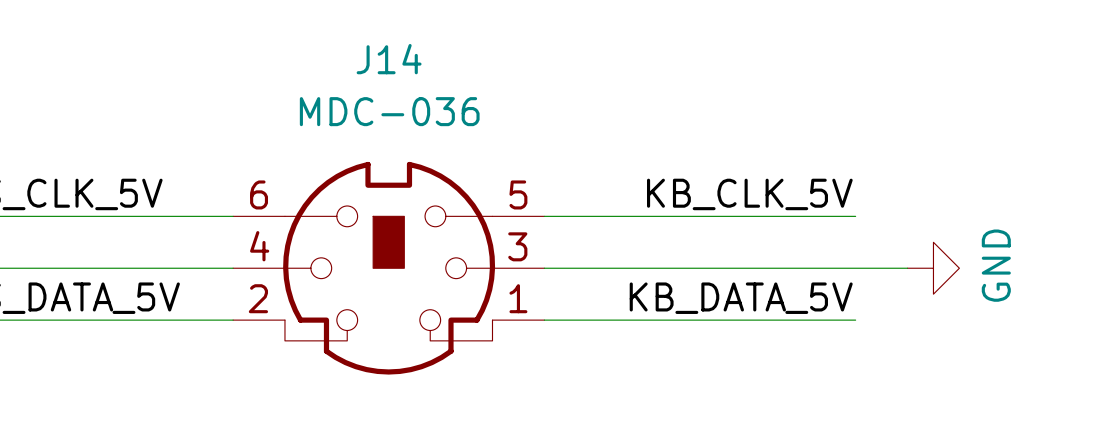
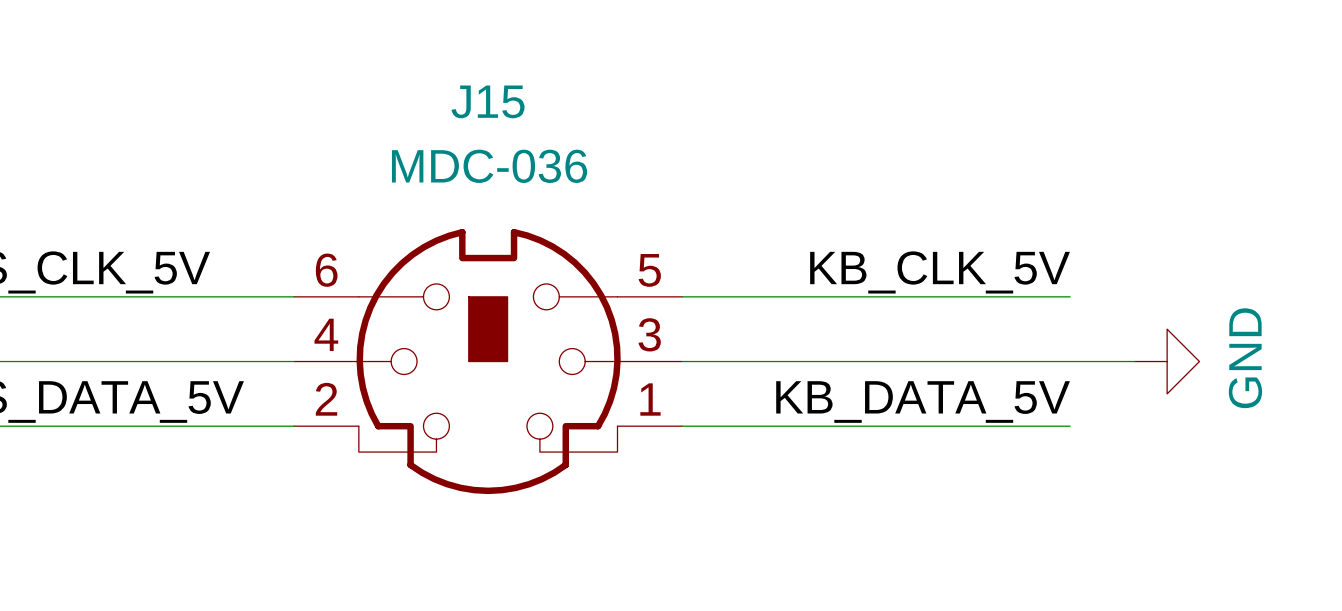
J14 name: J14 (389, 59) -> J15 (488, 101)

